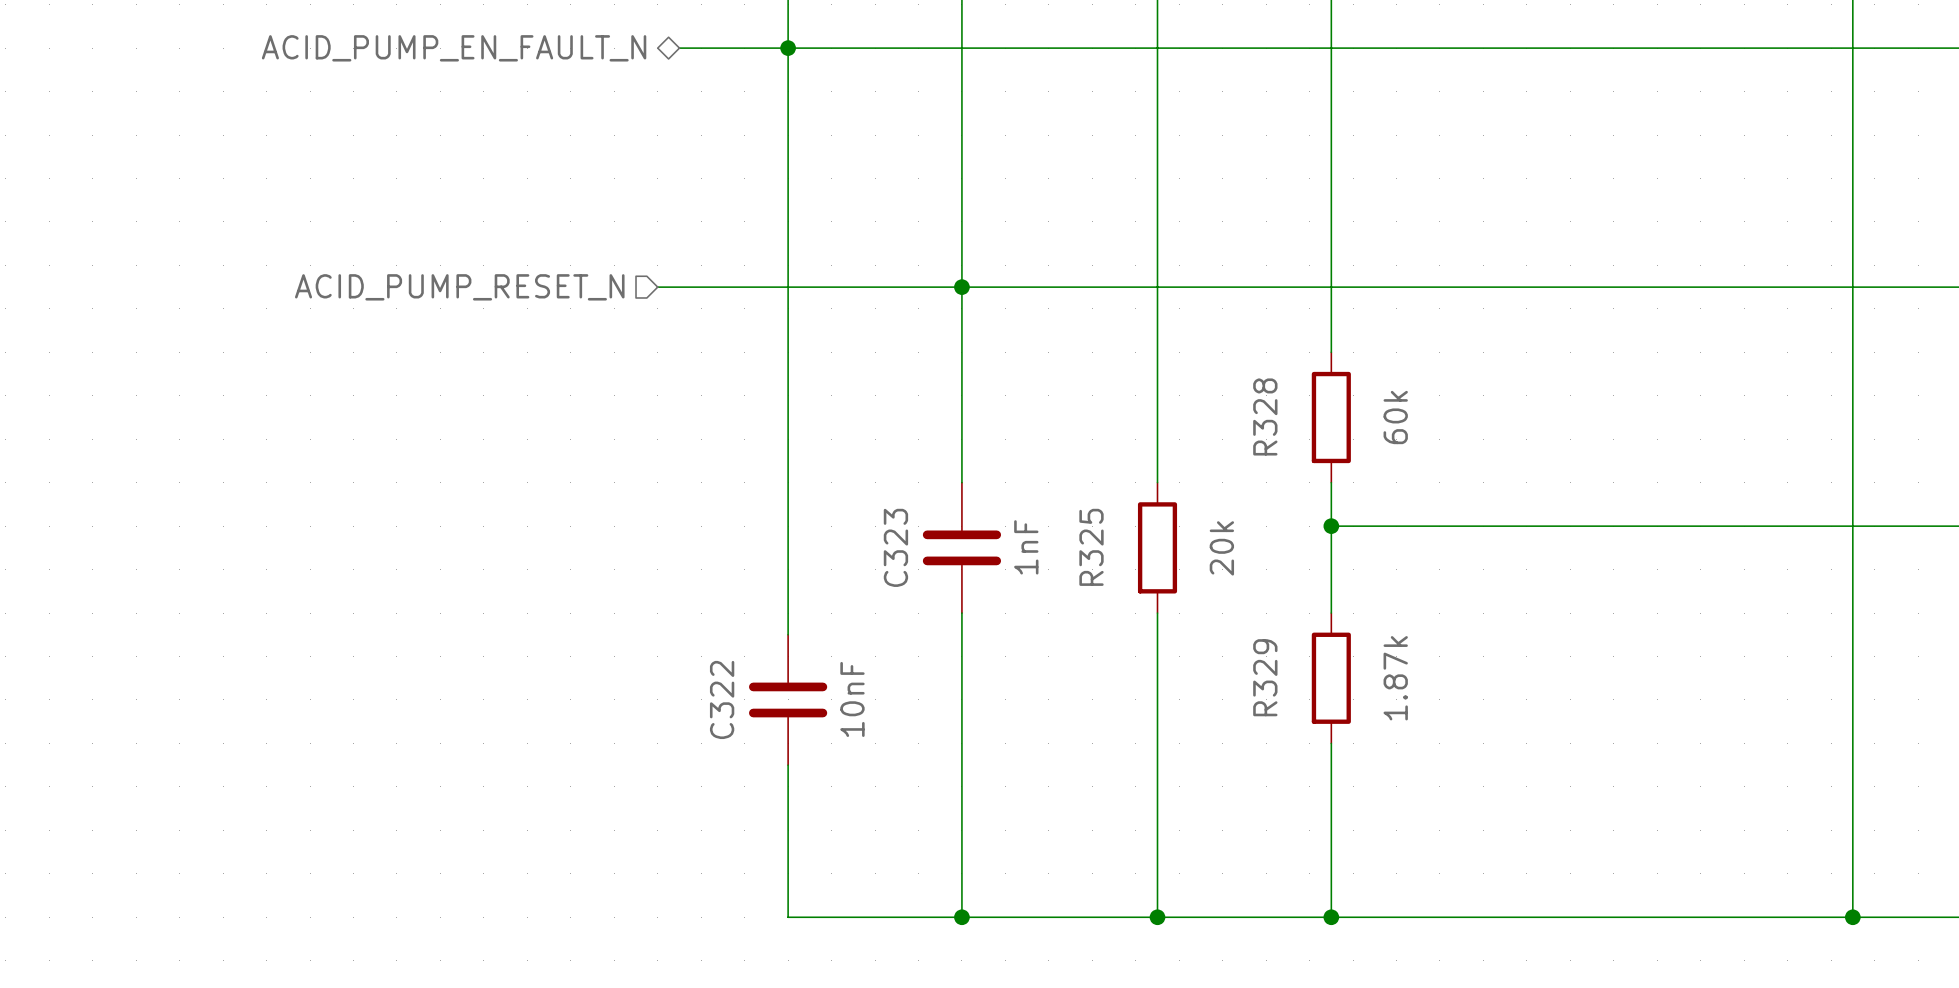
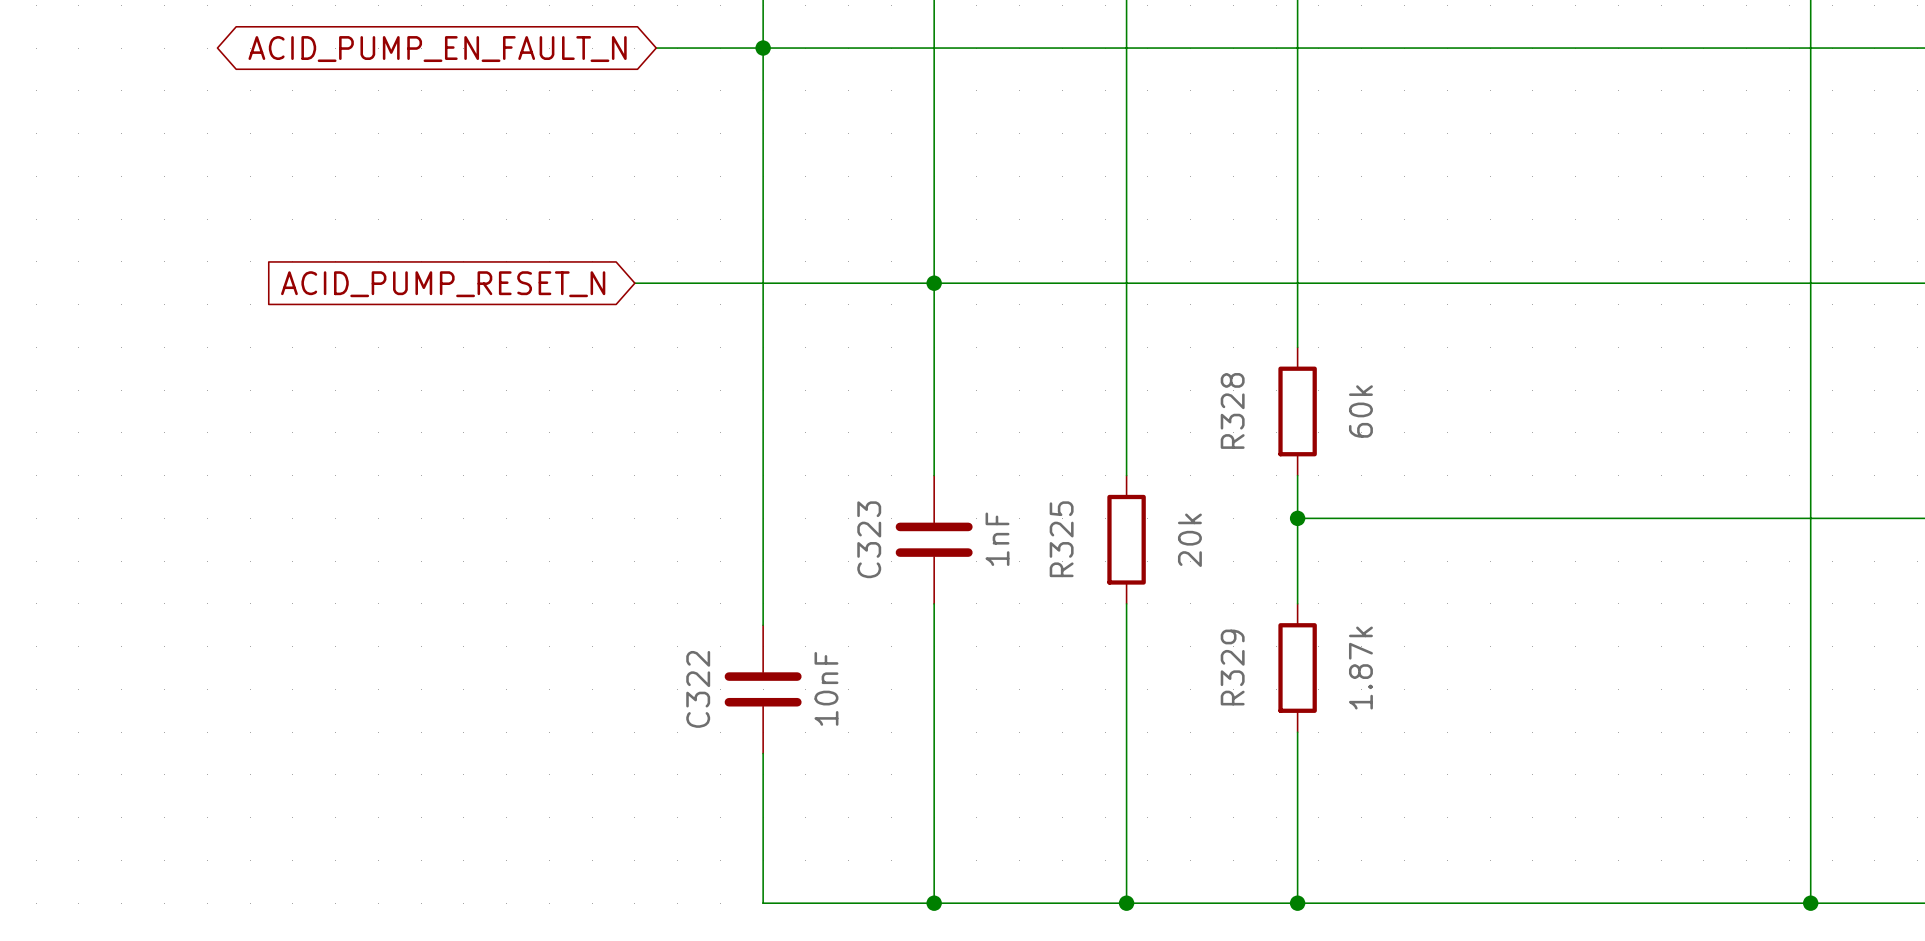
hierarchical label: ACID_PUMP_EN_FAULT_N (454, 48) -> none
global label: none -> ACID_PUMP_EN_FAULT_N (437, 49)
hierarchical label: ACID_PUMP_RESET_N (459, 287) -> none
global label: none -> ACID_PUMP_RESET_N (443, 284)

